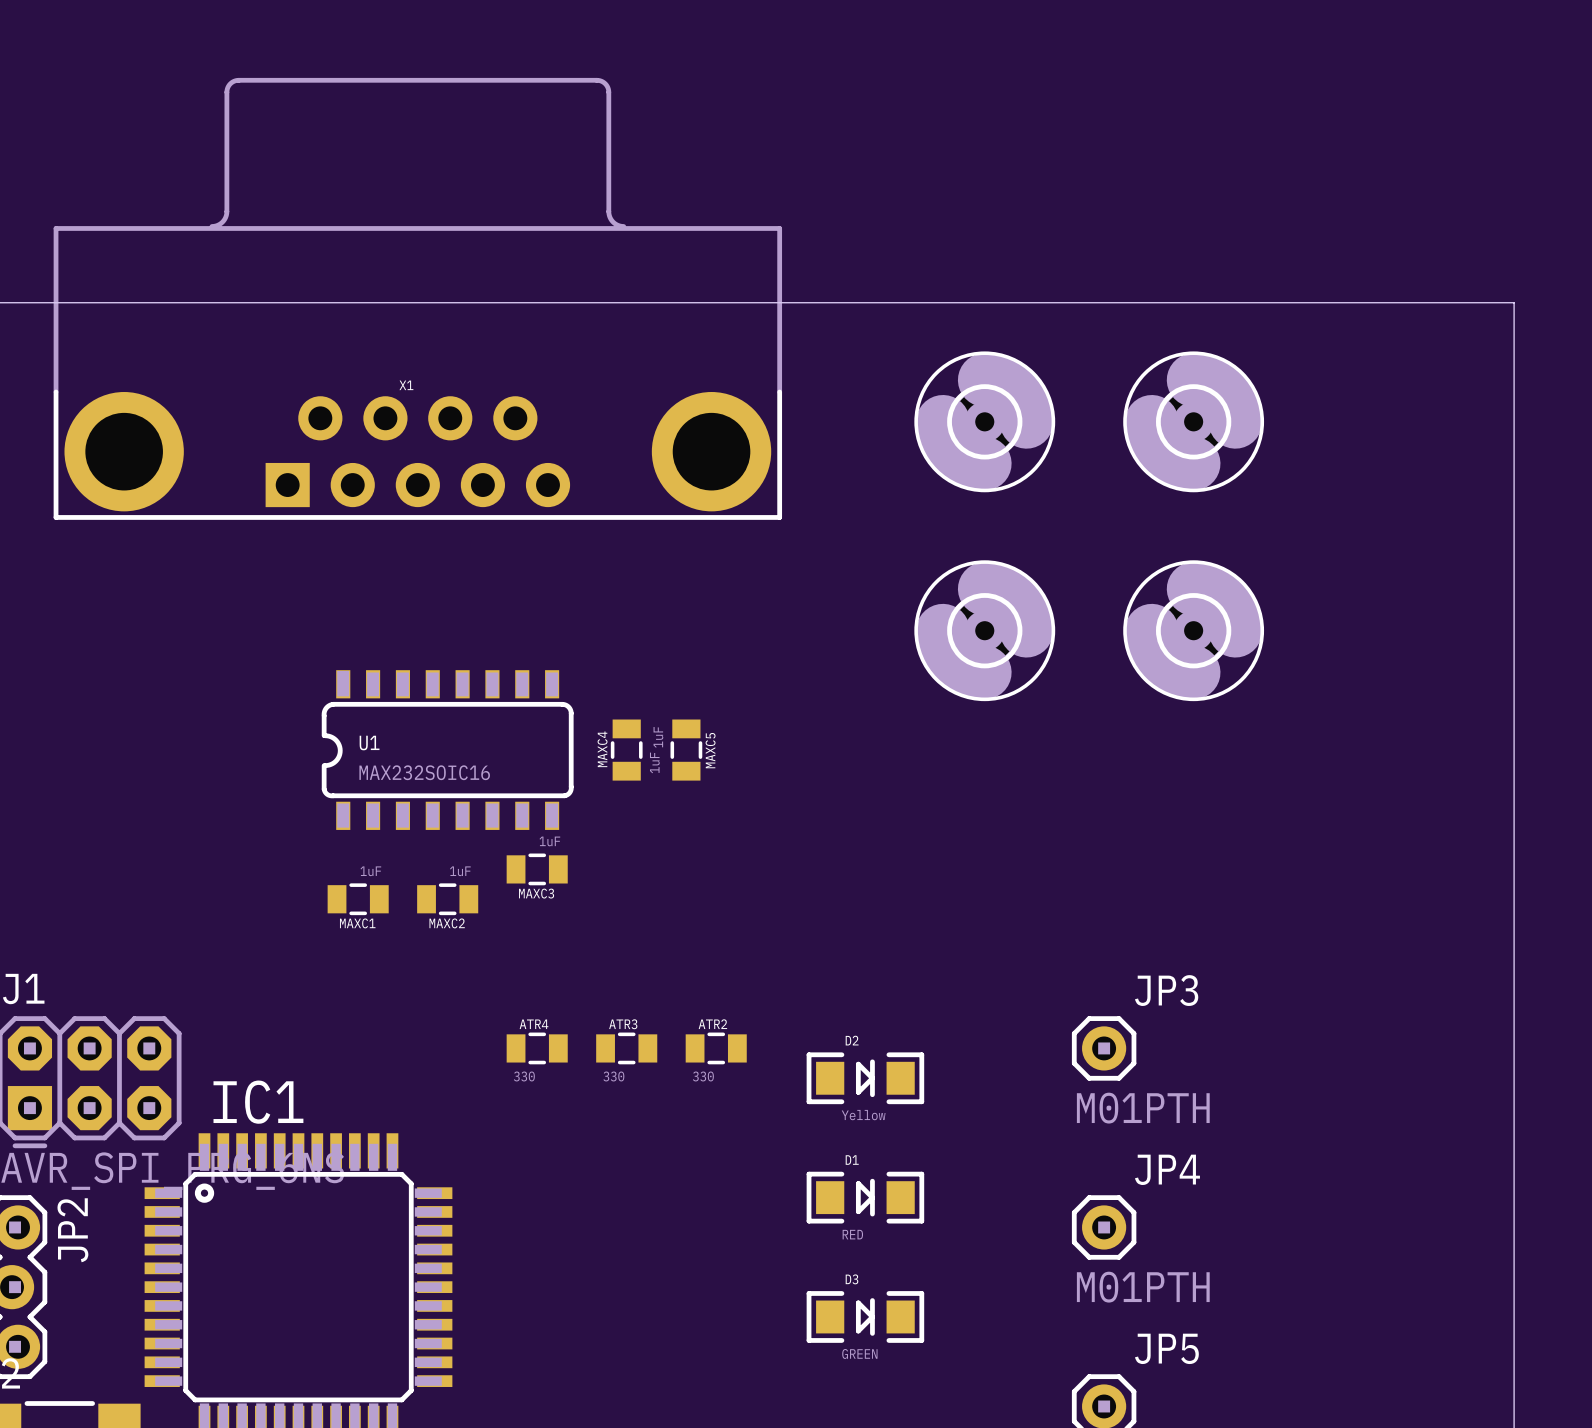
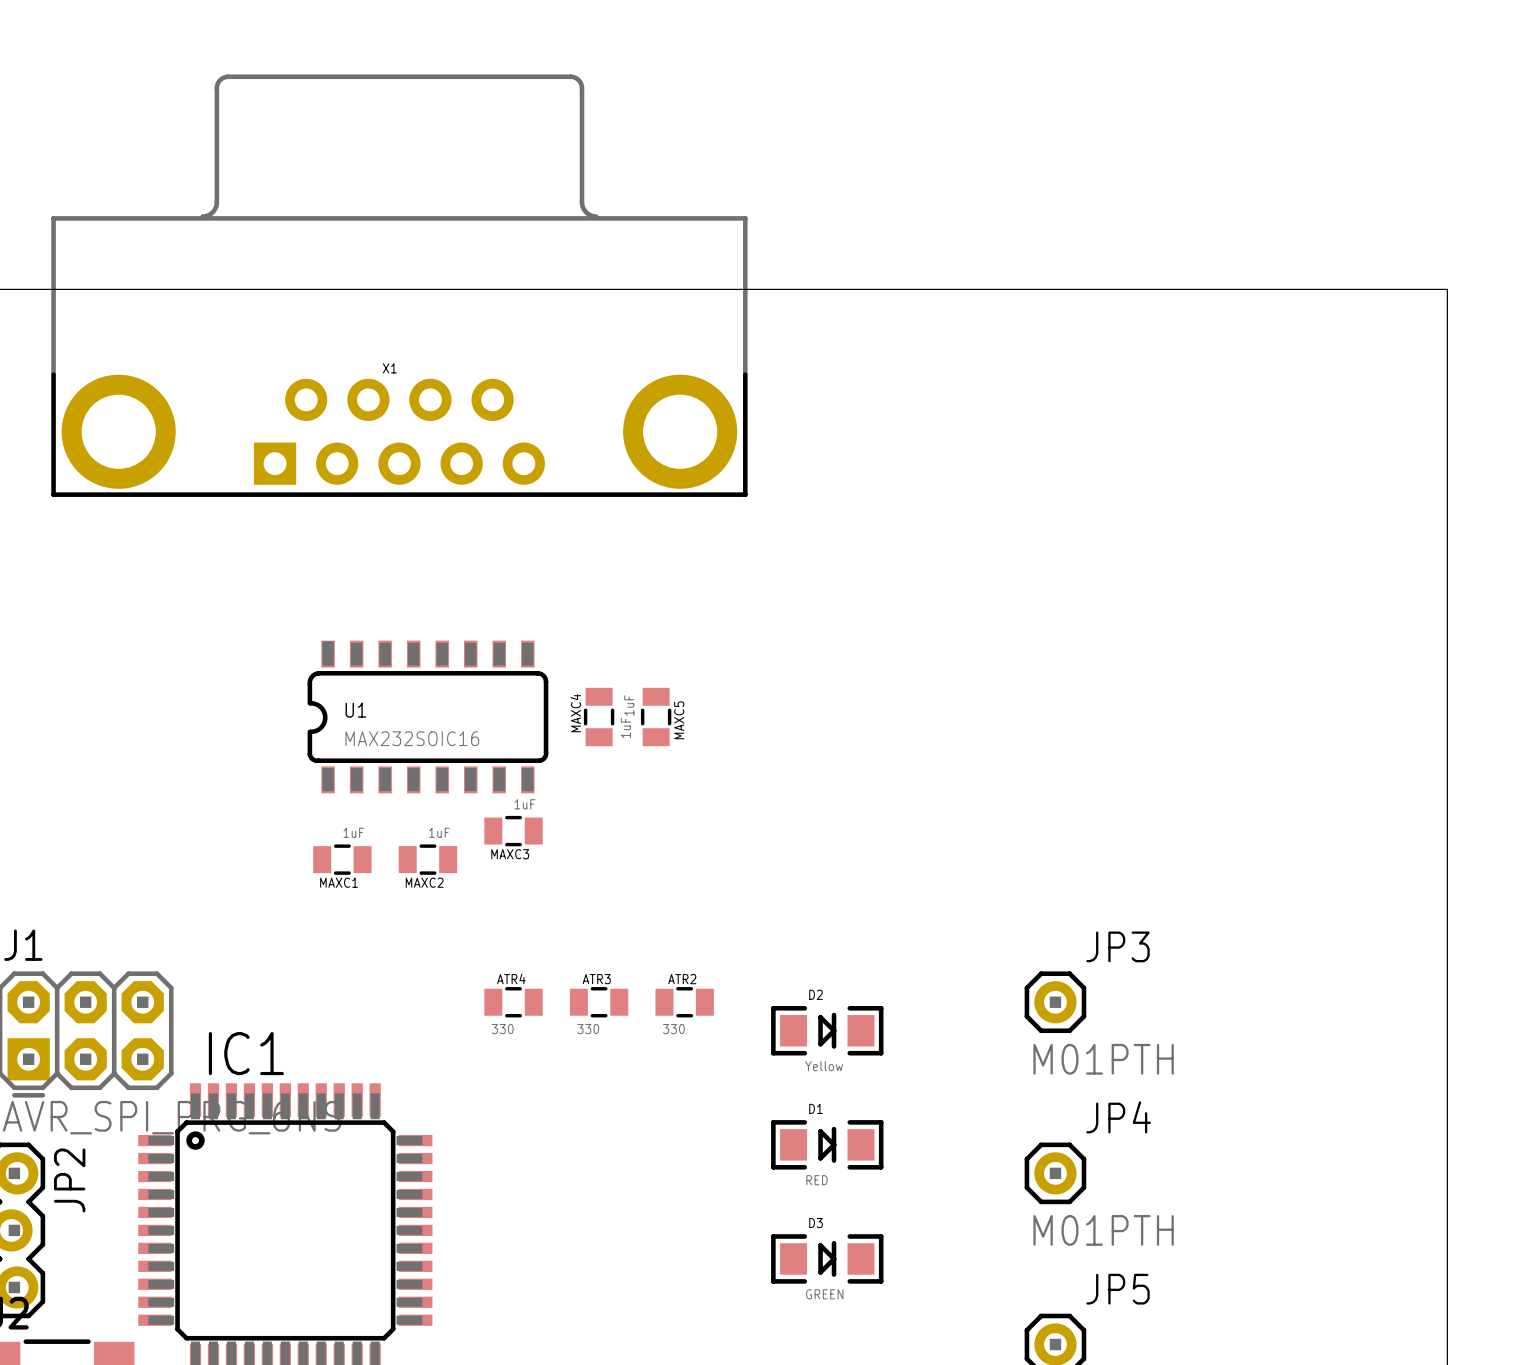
part: (984, 421) -> none
part: (1193, 421) -> none
part: (984, 630) -> none
part: (1193, 630) -> none

